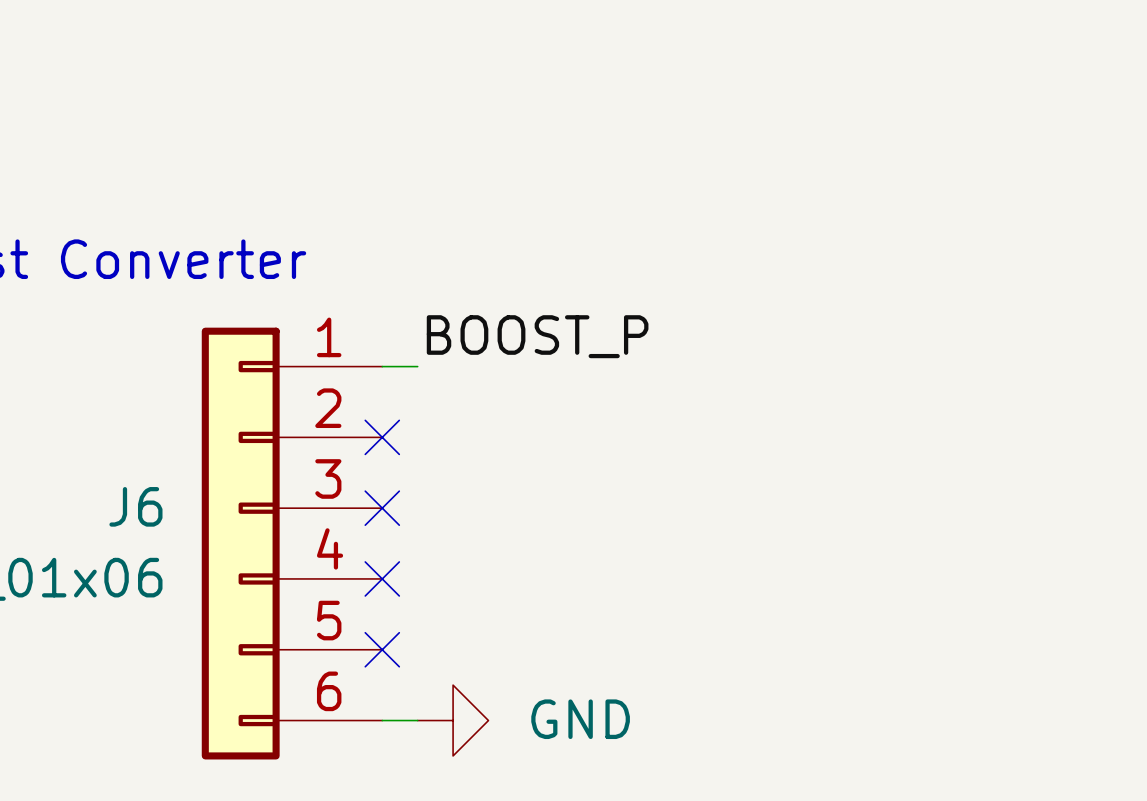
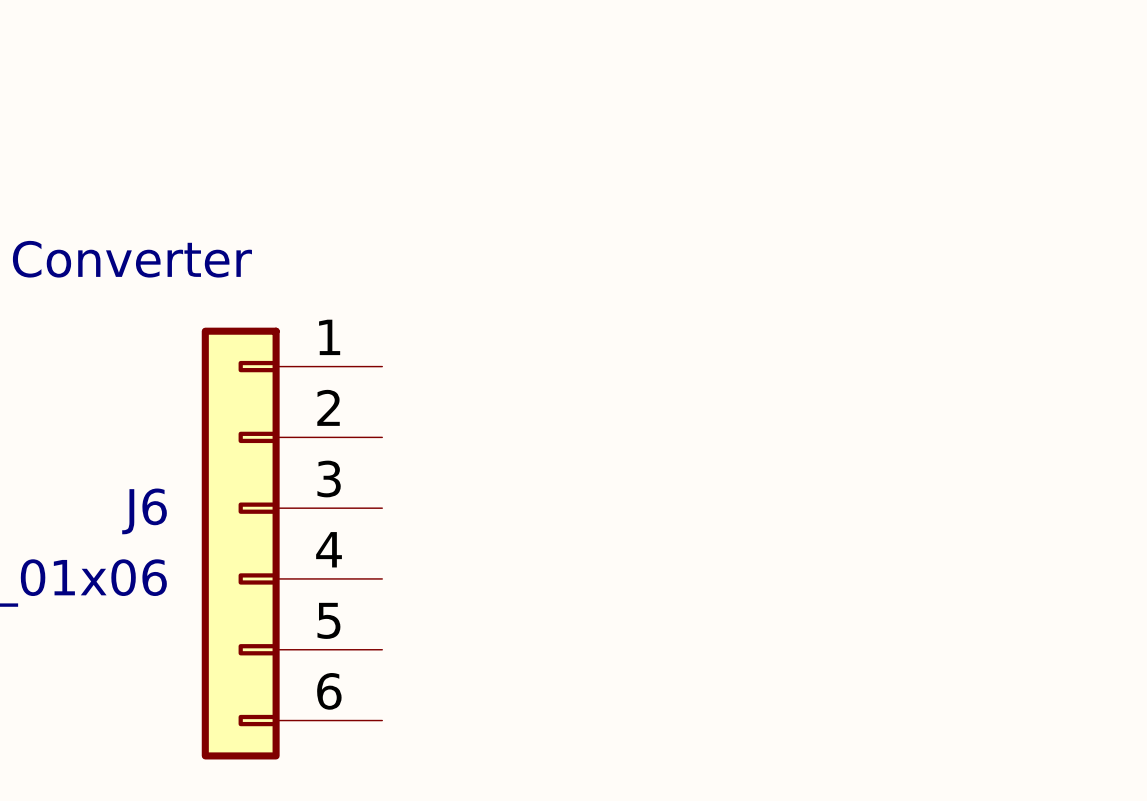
label: BOOST_P (537, 336) -> none
wire: (382, 366) (417, 366) -> none
no-connect mark: (382, 437) -> none
no-connect mark: (382, 508) -> none
no-connect mark: (382, 578) -> none
no-connect mark: (382, 649) -> none
wire: (382, 720) (417, 720) -> none
power symbol: GND (453, 720) -> none

